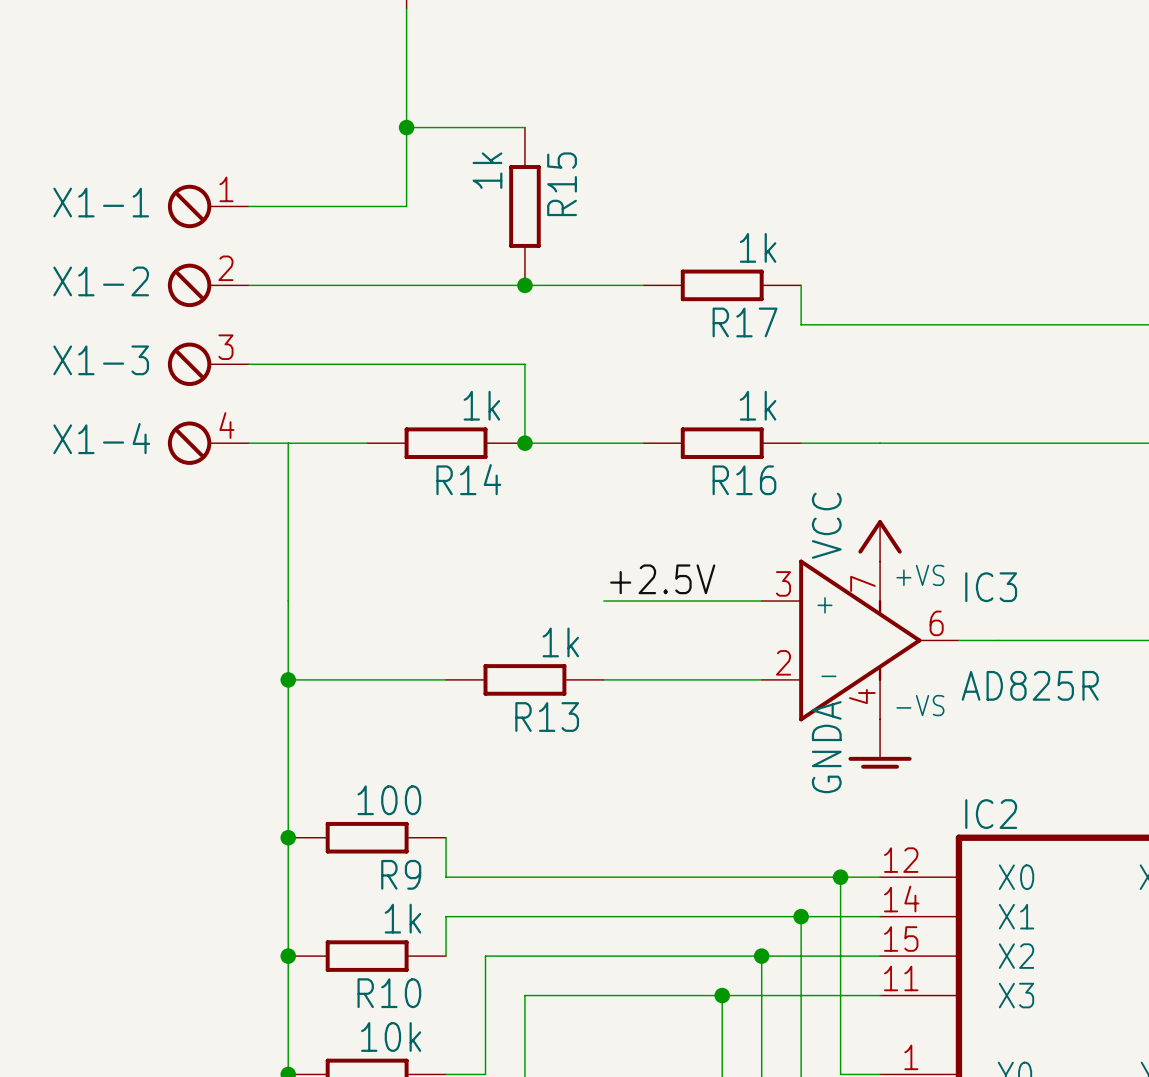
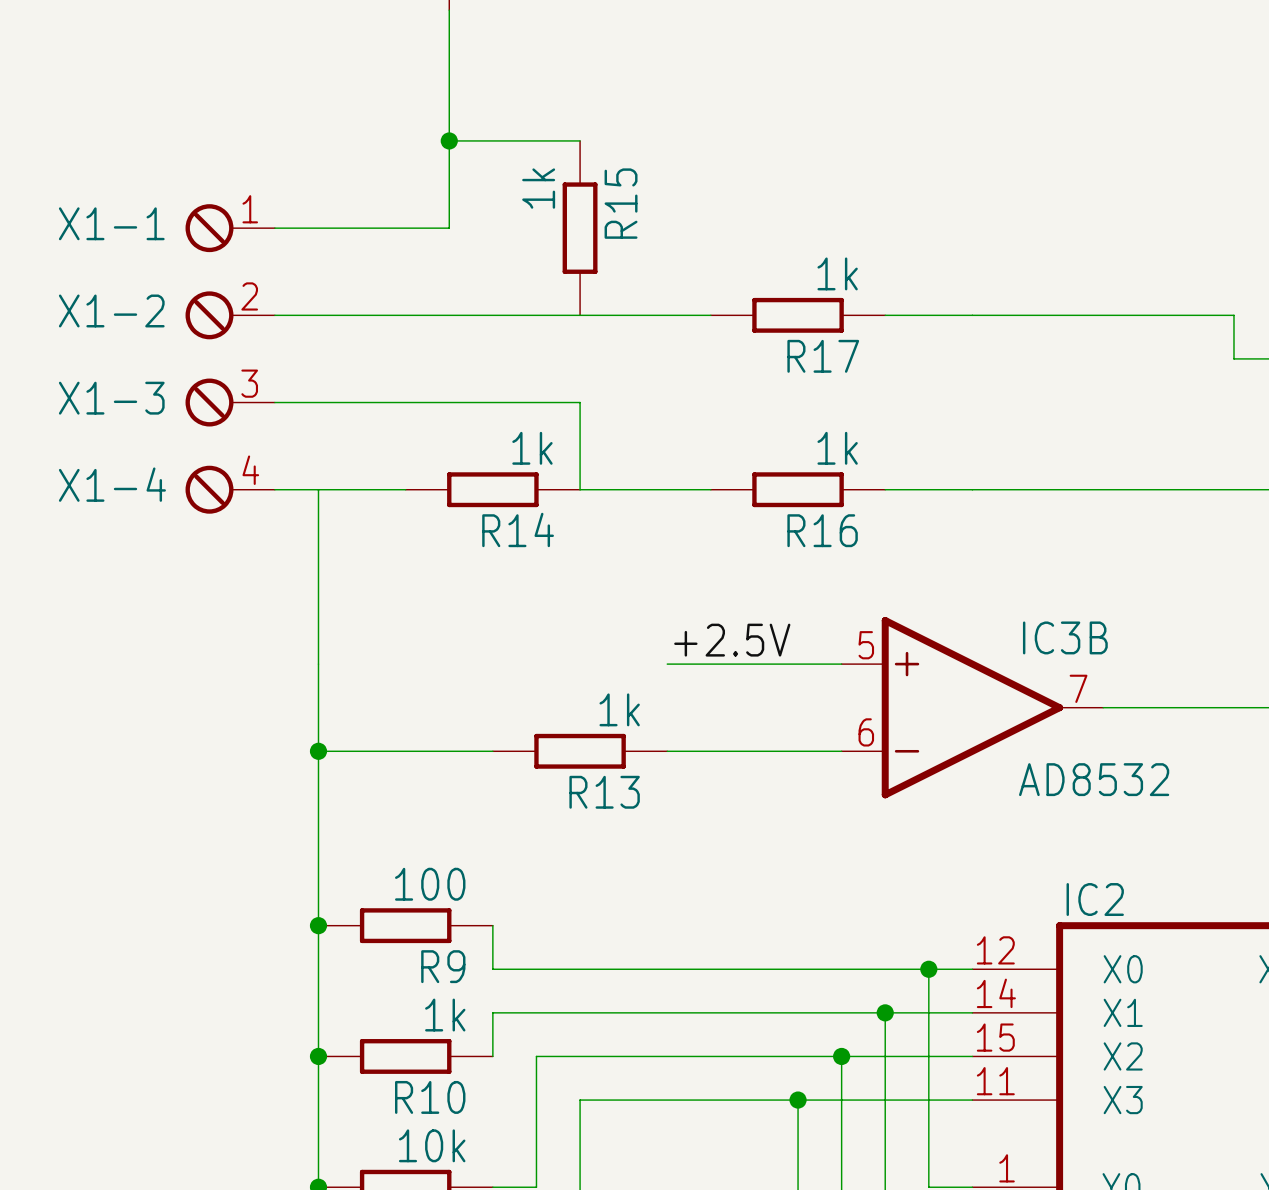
junction: (524, 285) -> none
wire: (801, 285) (801, 324) (1116, 324) -> (885, 315) (1233, 315) (1233, 358)
junction: (524, 443) -> none
power symbol: VCC (880, 540) -> none
IC3: AD825R (860, 640) -> none
IC3B: none -> AD8532 (972, 707)
power symbol: GNDA (880, 744) -> none

